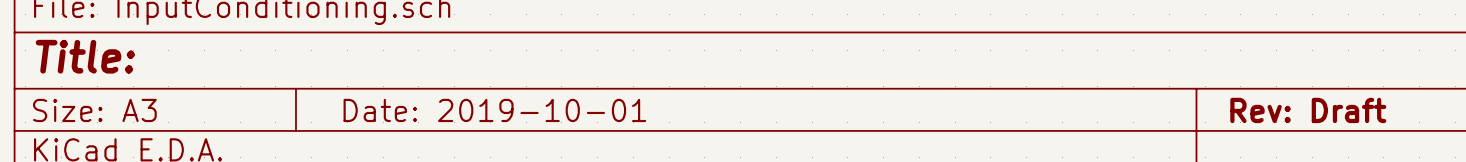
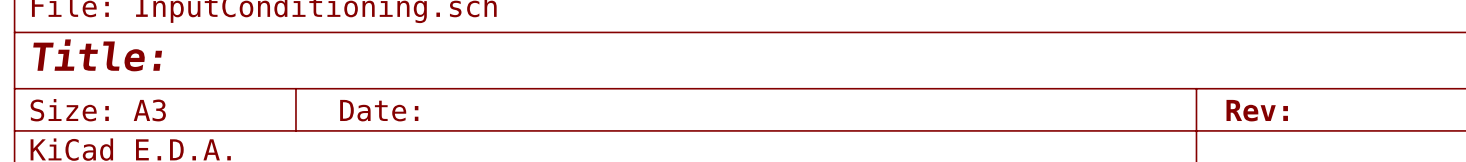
title block: Date: 2019-10-01 (494, 110) -> Date: (379, 110)
title block: Rev: Draft (1308, 110) -> Rev: (1257, 110)

